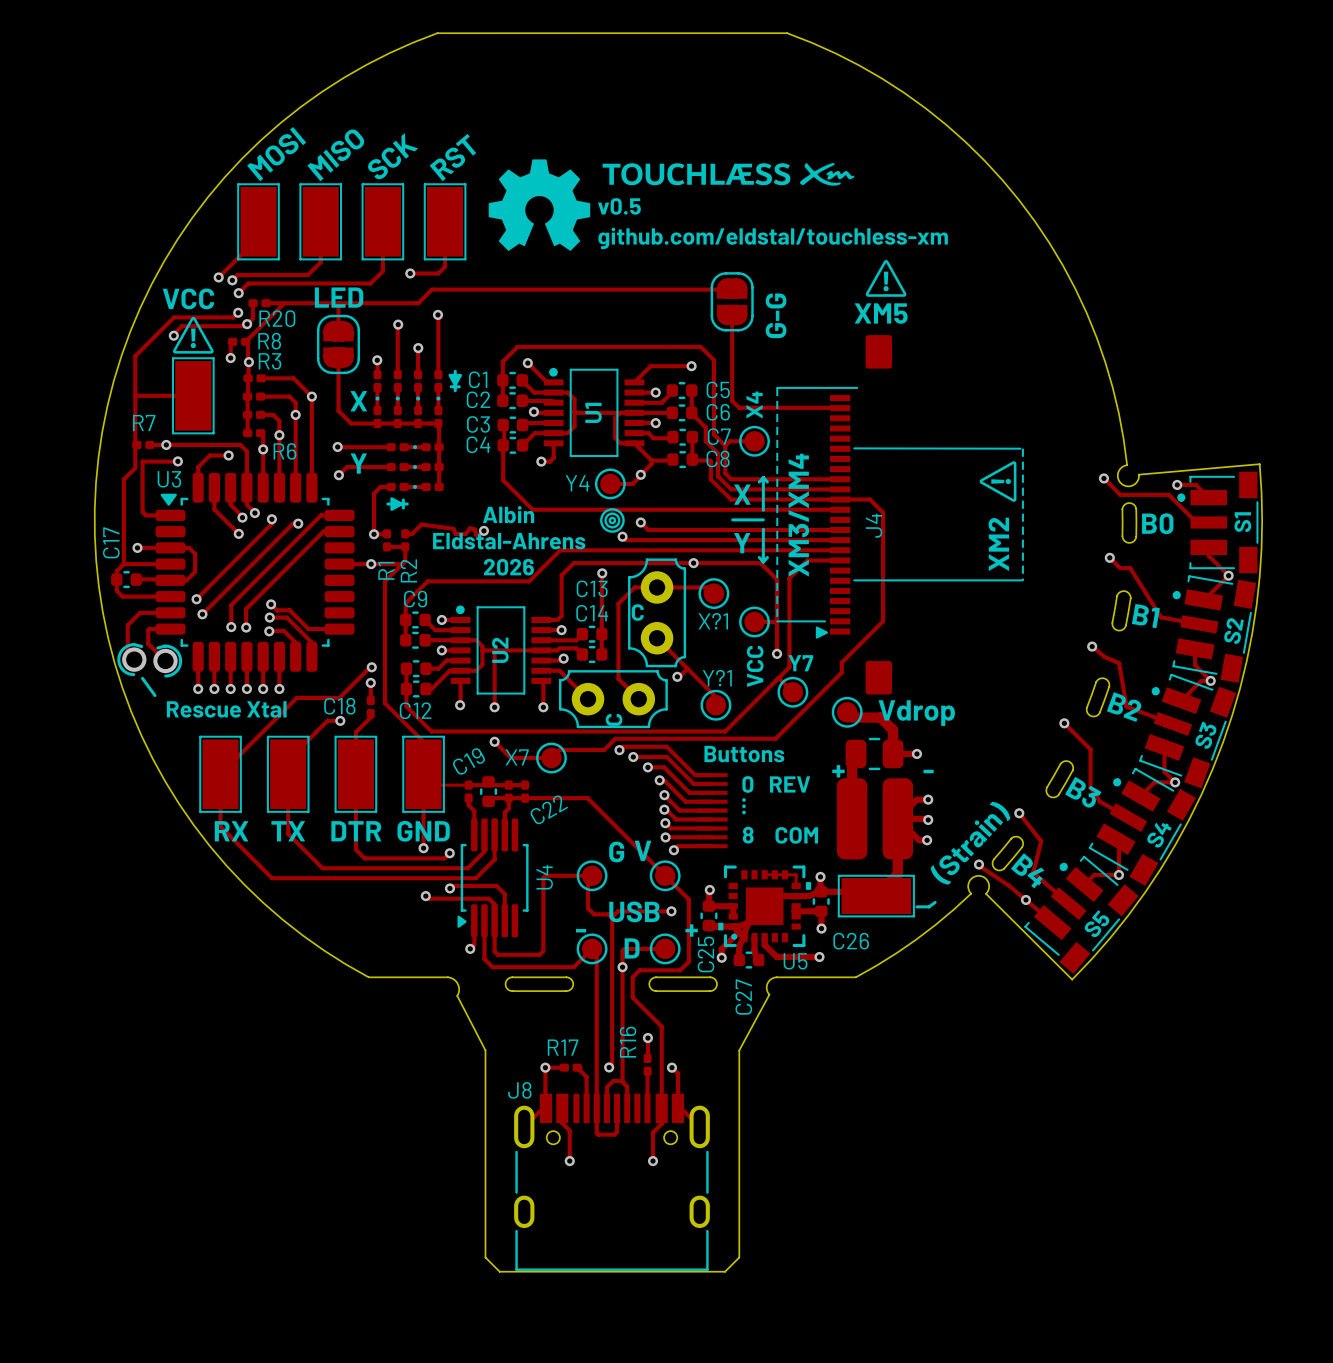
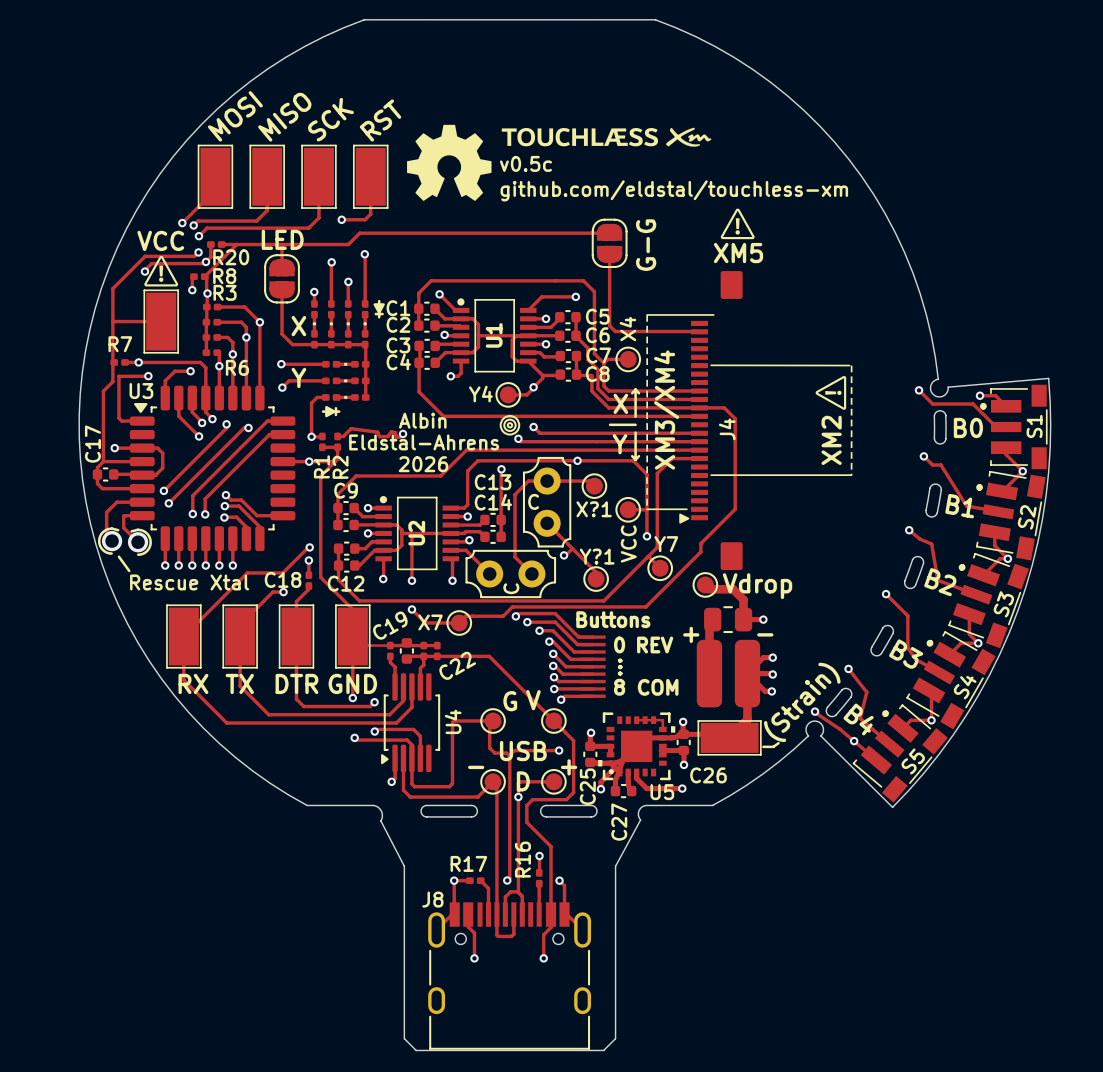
text: v0.5 (619, 206) -> v0.5c (525, 163)

